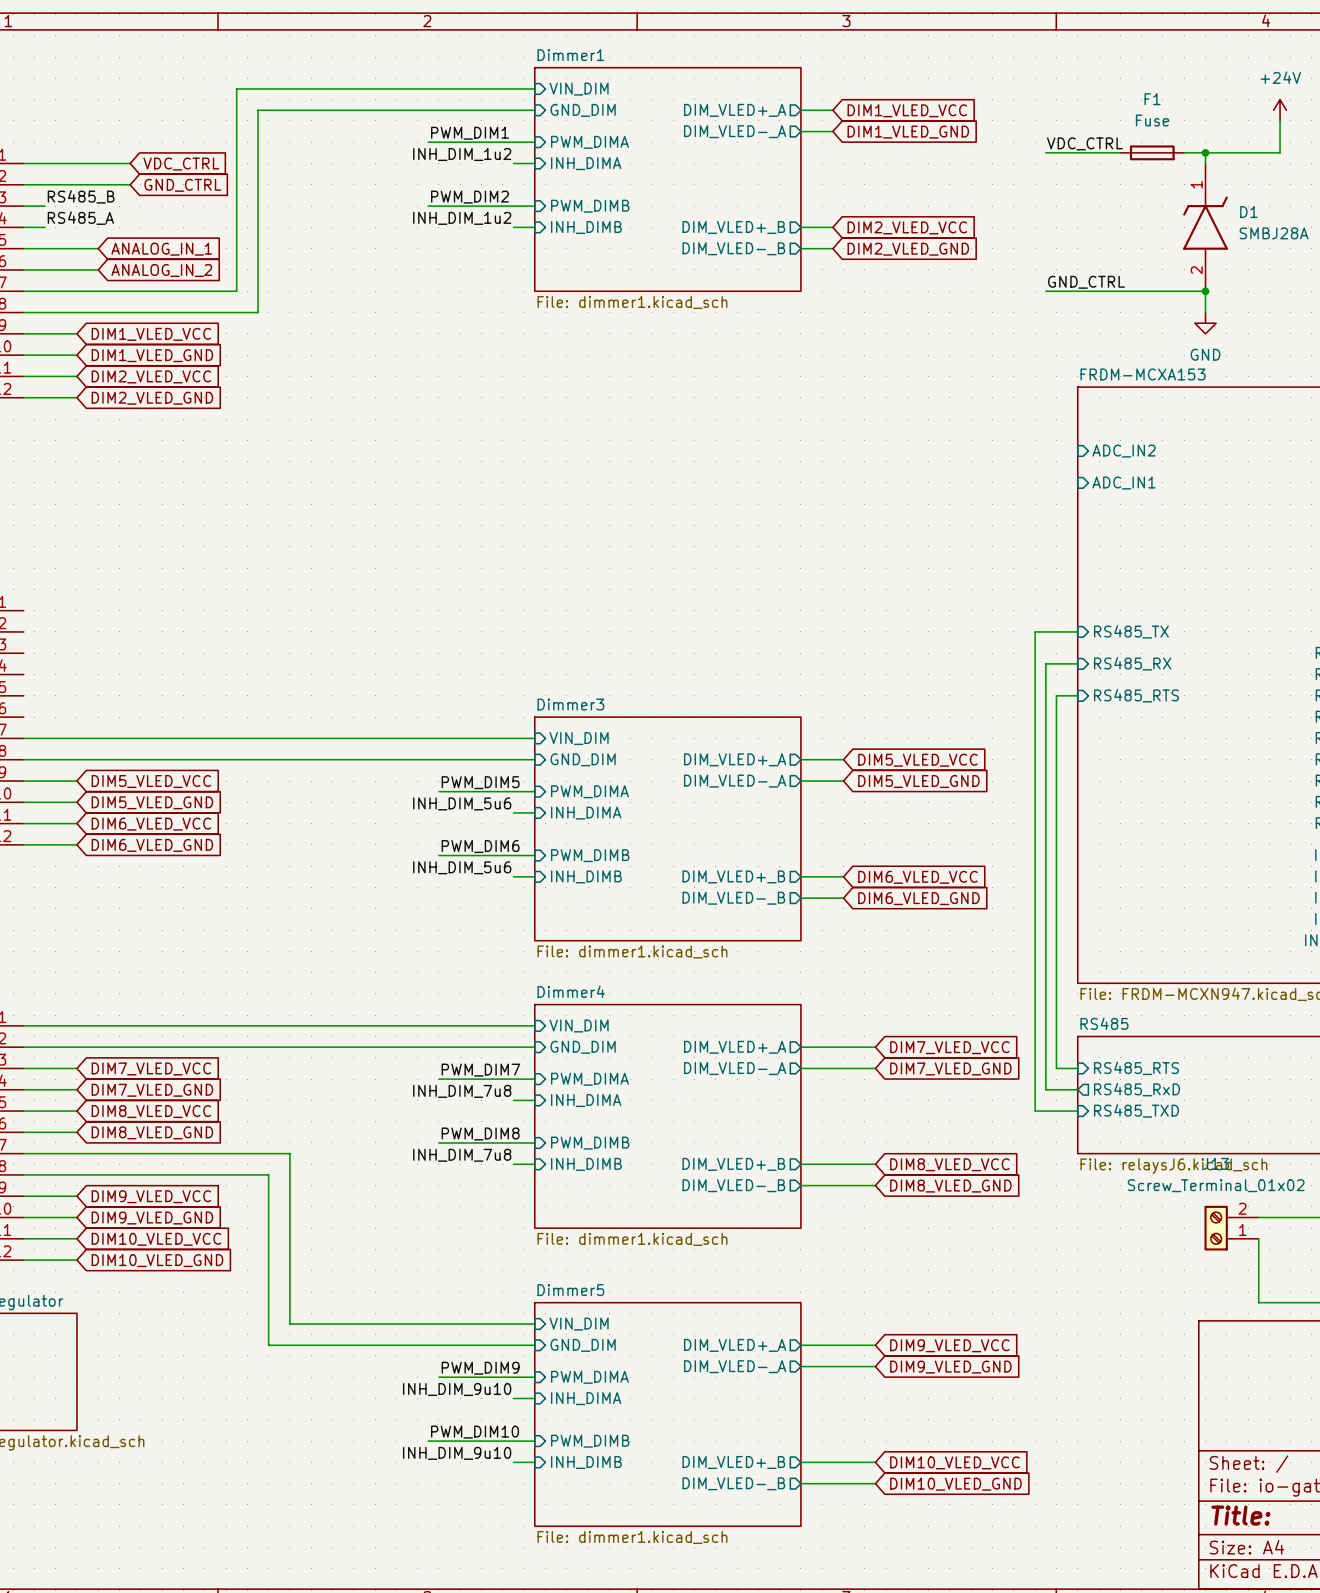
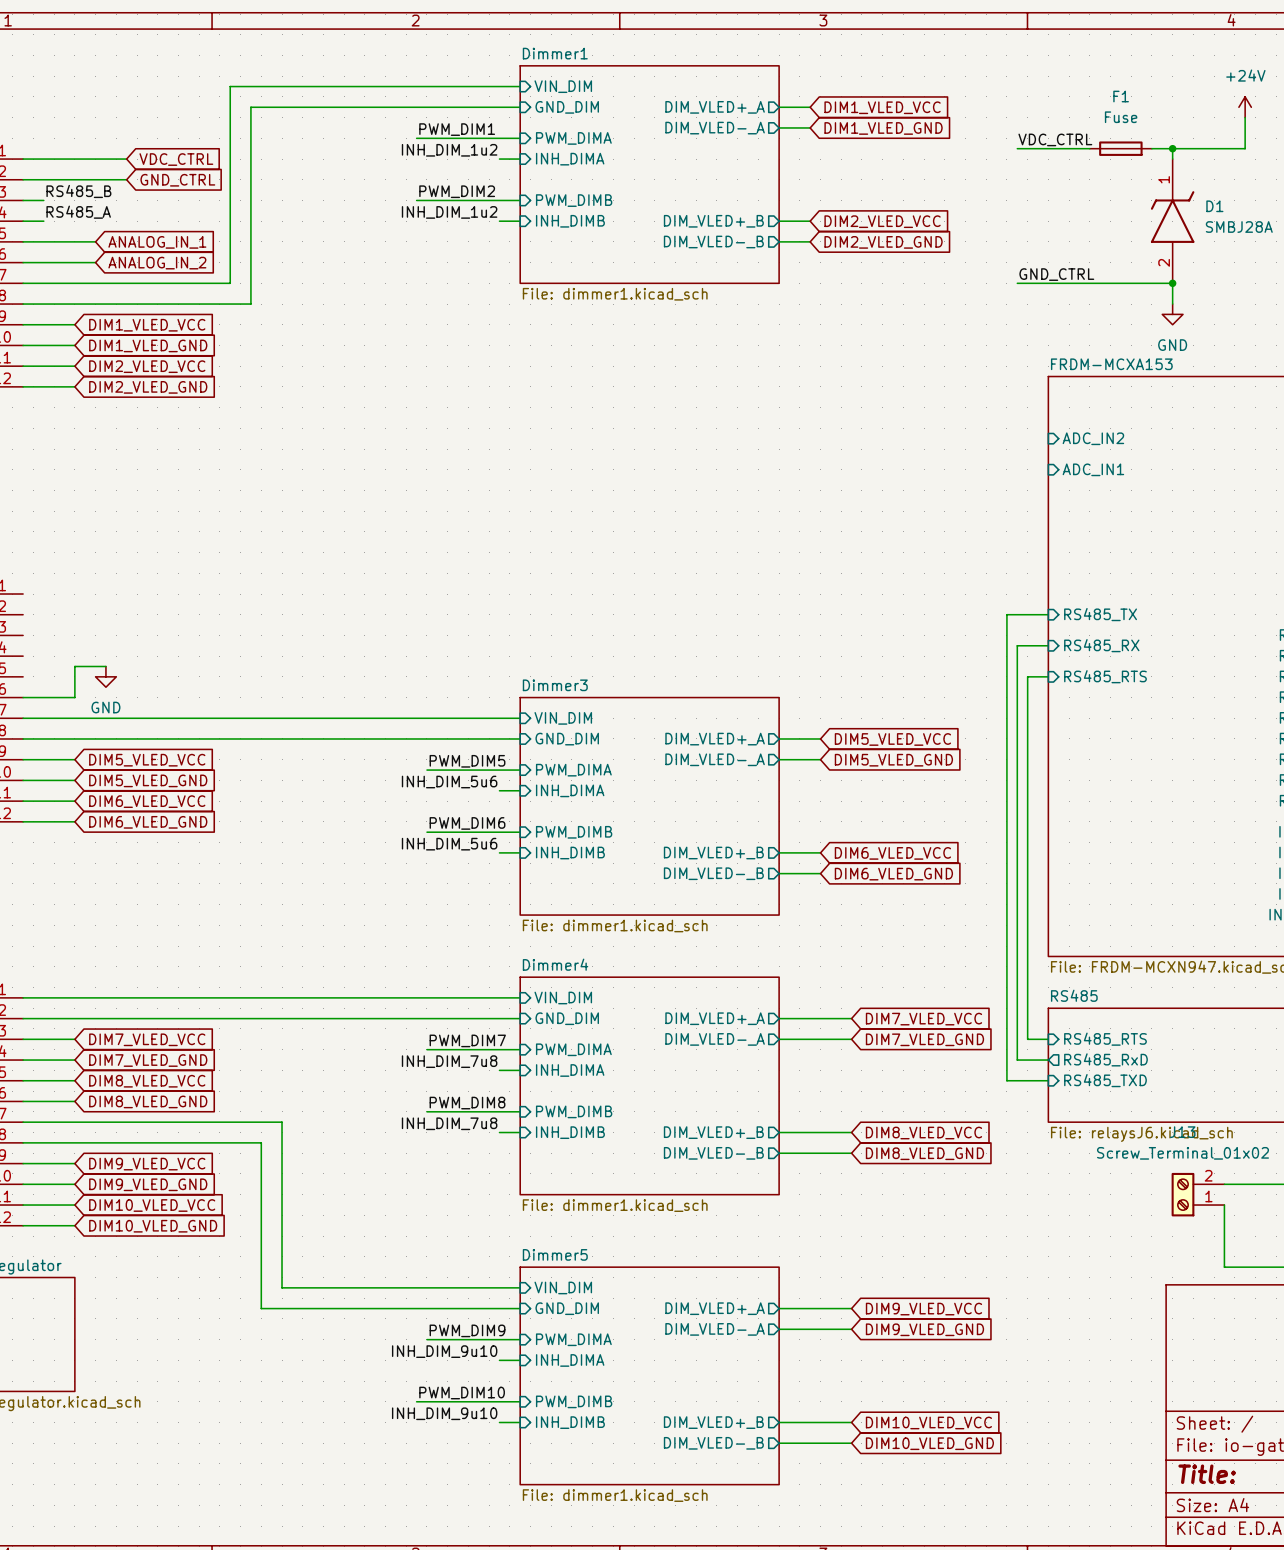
wire: none -> (105, 666) (74, 666) (74, 697) (23, 697)
power symbol: none -> GND (105, 676)

